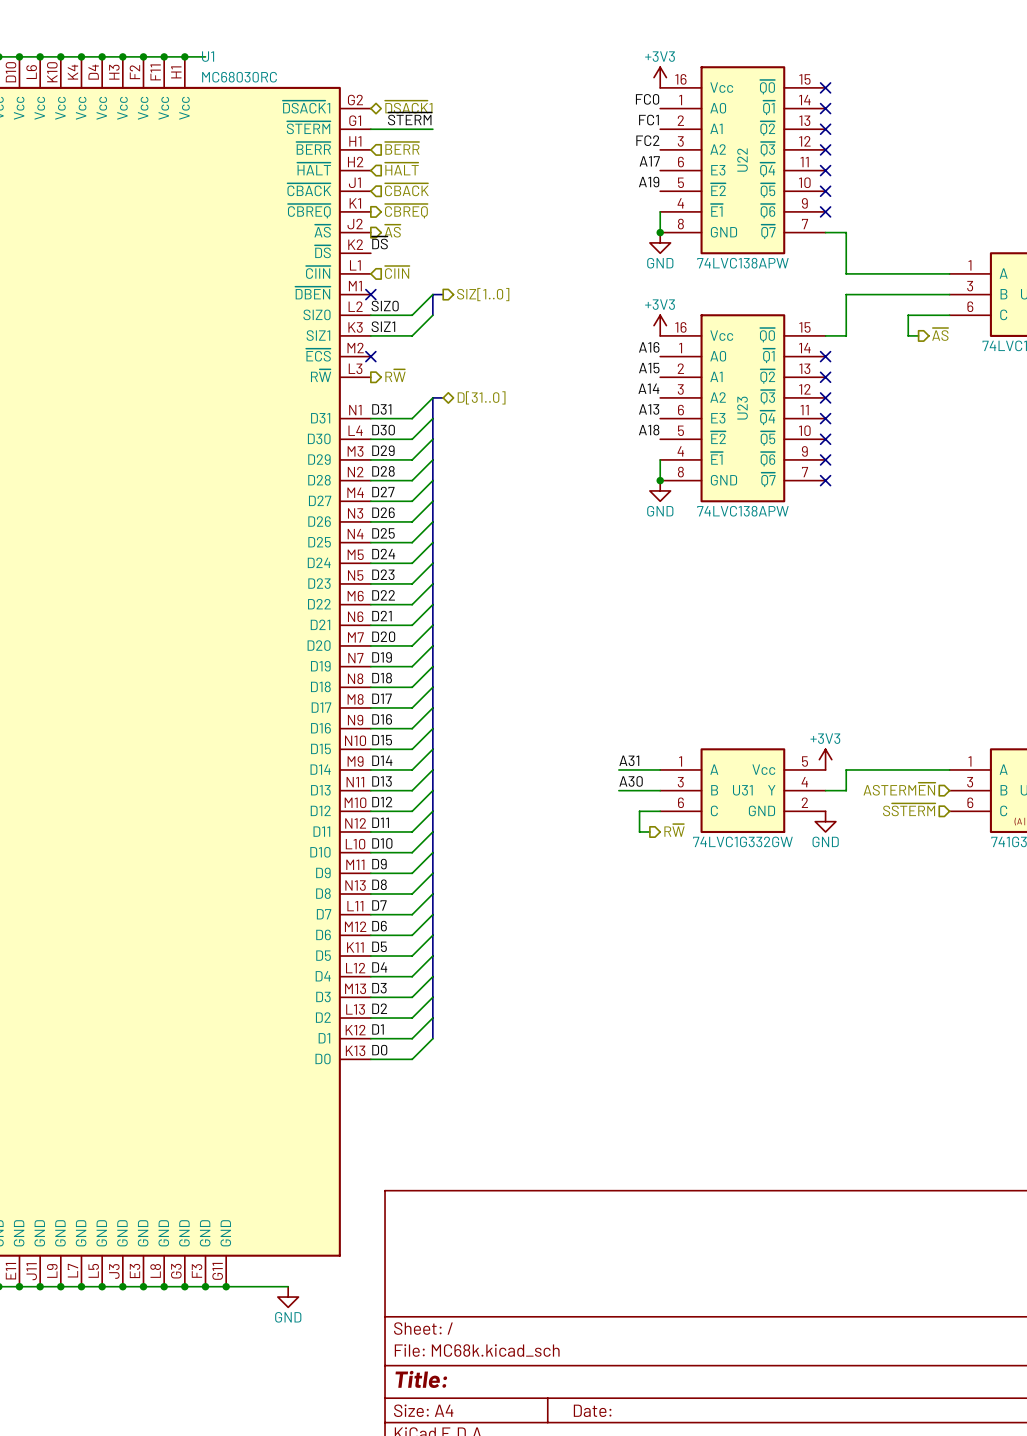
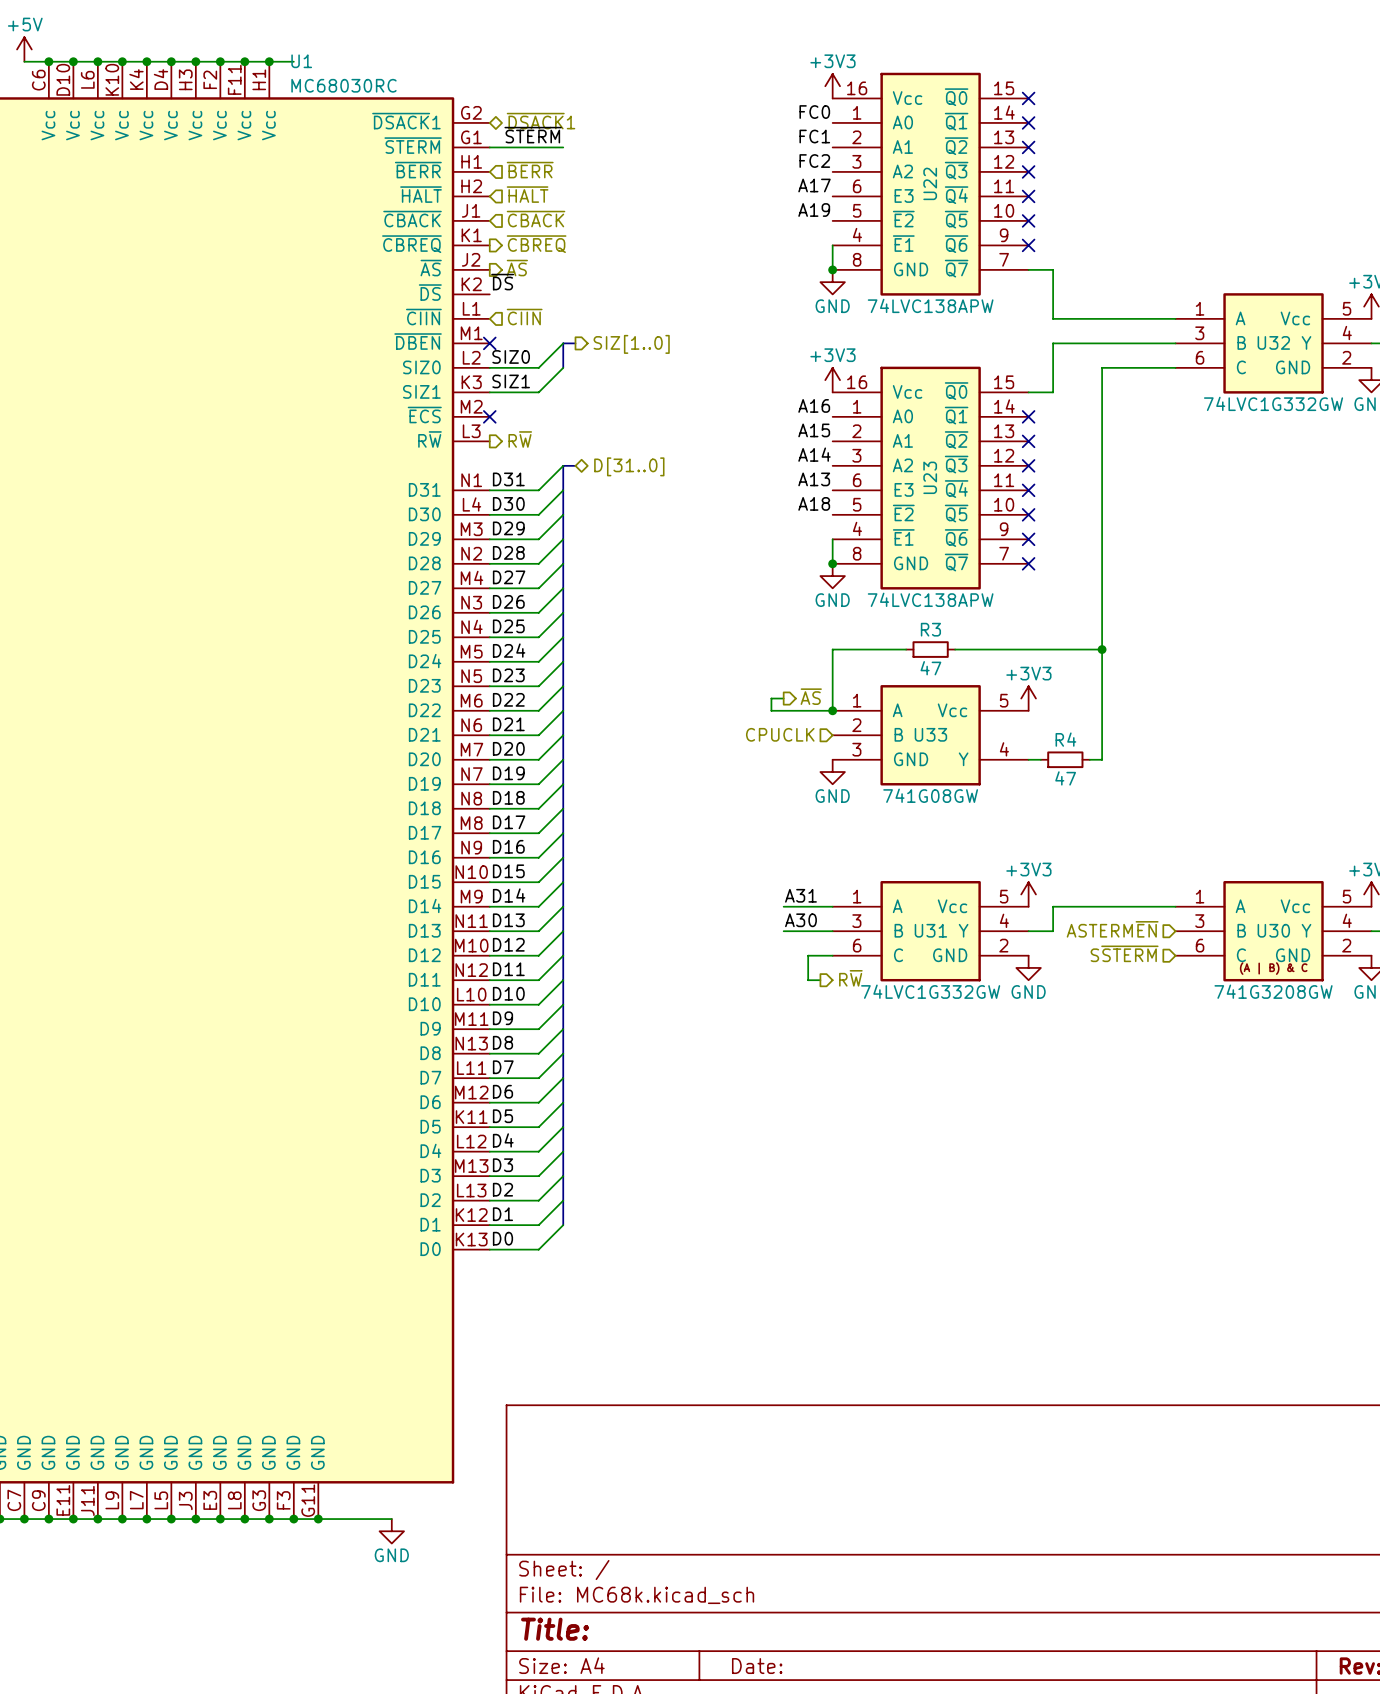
wire: (908, 315) (908, 335) (918, 335) -> (1126, 367) (1102, 367) (1102, 759) (1089, 759)
hierarchical label: ~{AS} (940, 334) -> none
wire: none -> (906, 649) (832, 649) (832, 710) (771, 710) (771, 698) (783, 698)
R3: none -> 47 (930, 649)
wire: none -> (955, 649) (1102, 649)
junction: none -> (1102, 649)
hierarchical label: none -> ~{AS} (811, 696)
power symbol: none -> +3V3 (1028, 698)
junction: none -> (832, 710)
hierarchical label: none -> CPUCLK (780, 734)
U33: none -> 741G08GW (930, 735)
wire: none -> (1028, 759) (1040, 759)
R4: none -> 47 (1065, 759)
power symbol: none -> GND (832, 772)

